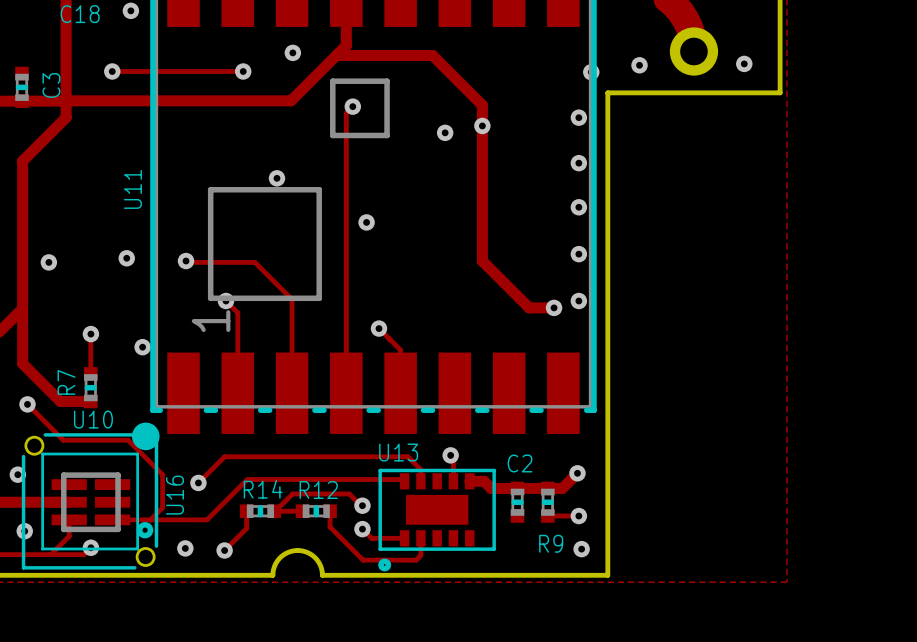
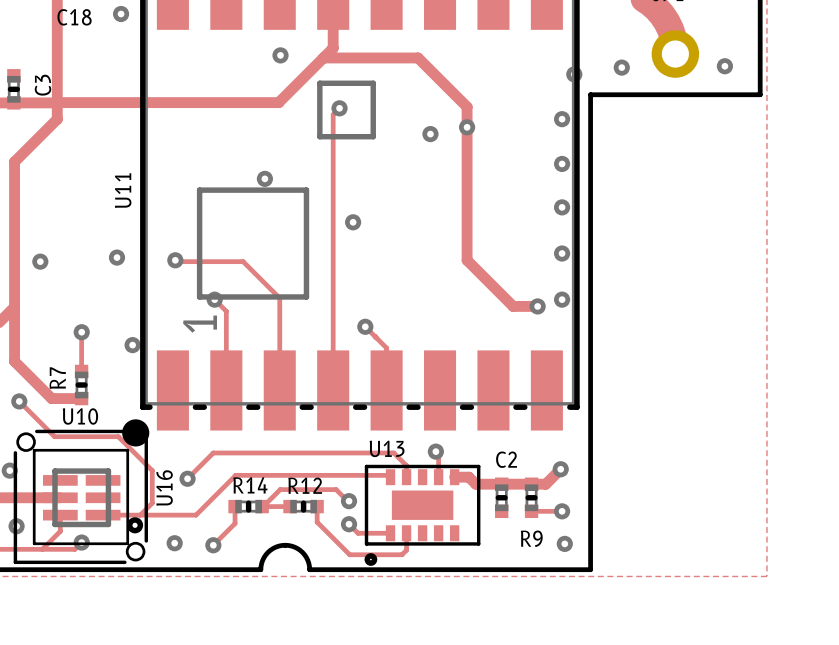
track: (112, 71) (243, 71) -> none
via: (112, 71) -> none
via: (243, 71) -> none

